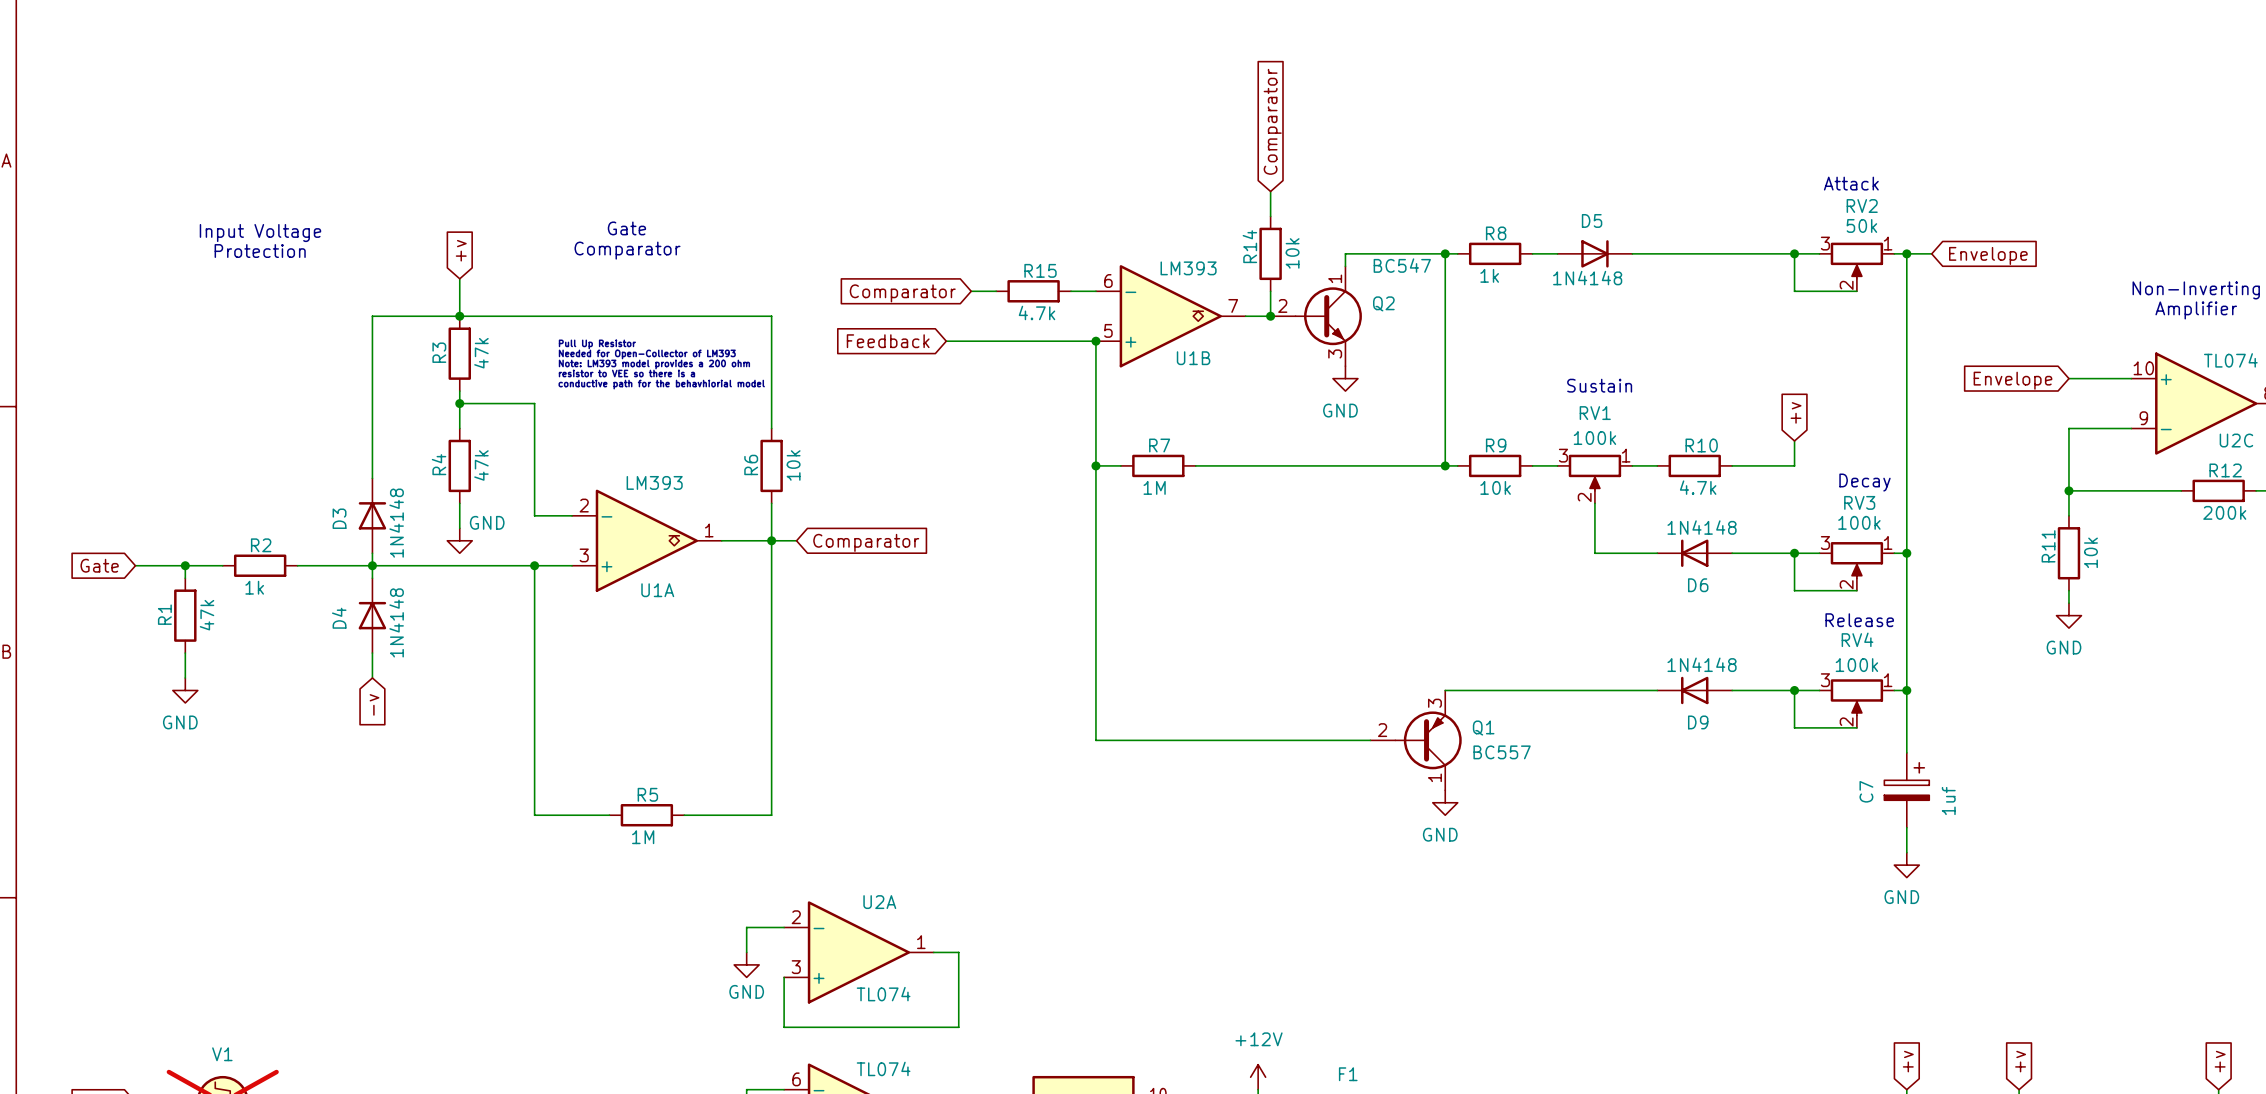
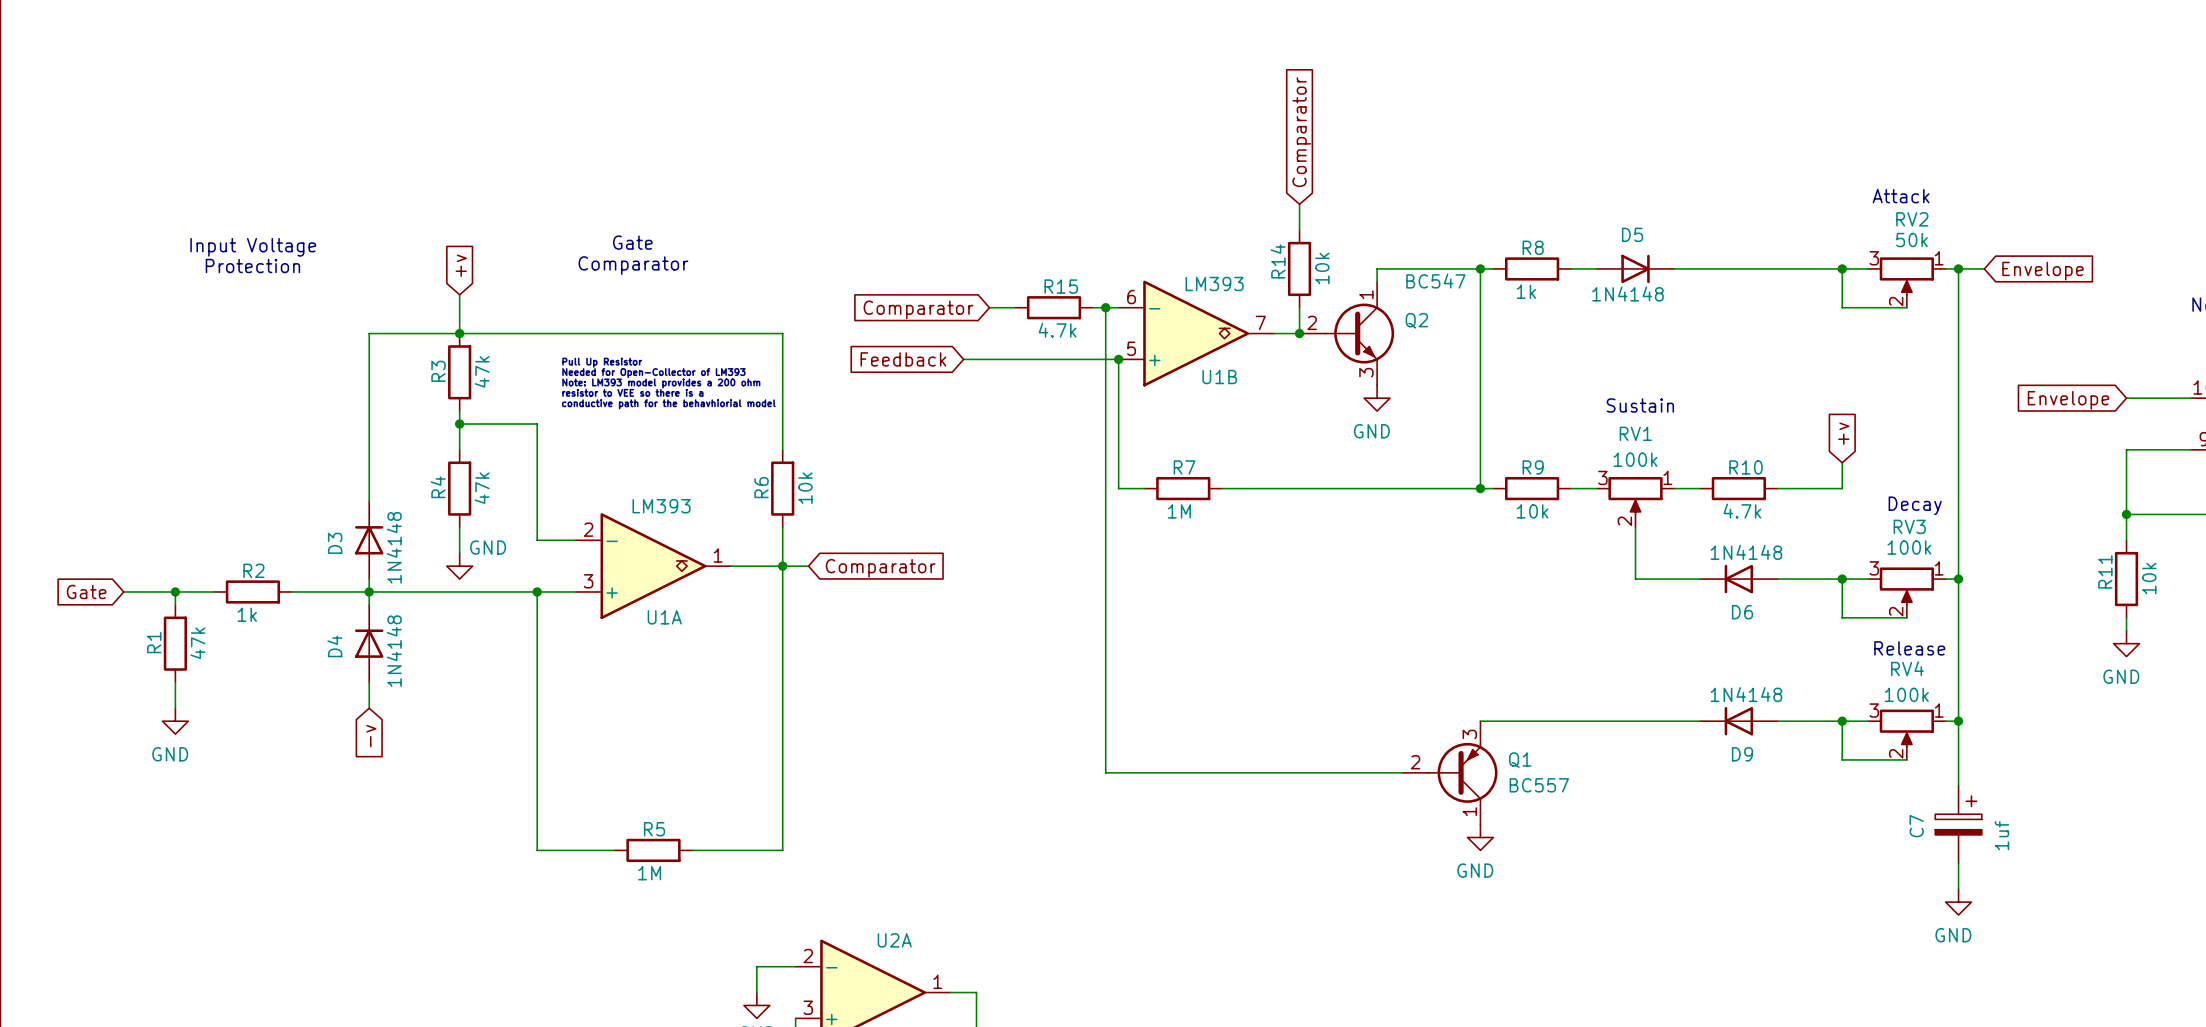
junction: none -> (1105, 307)
wire: (1095, 465) (1095, 740) -> (1105, 307) (1105, 772) (1118, 772)
junction: (1095, 465) -> none

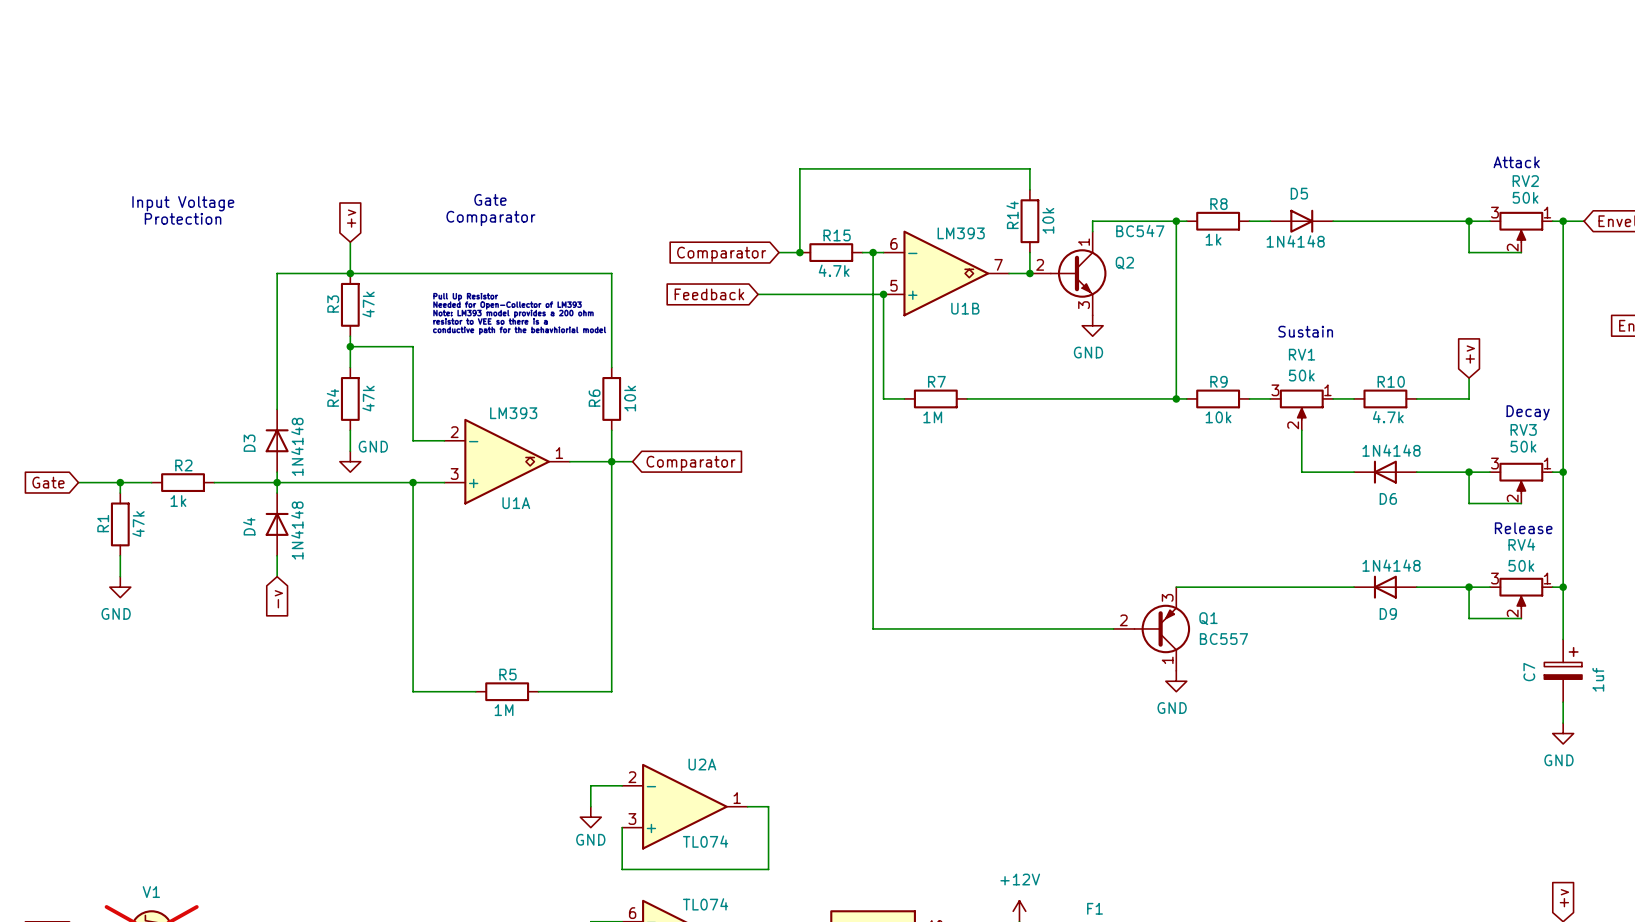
global label: Comparator (1301, 132) -> none
wire: none -> (1029, 168) (799, 168) (799, 252)
junction: none -> (799, 252)
RV1 value: 100k (1635, 459) -> 50k (1301, 375)
RV3 value: 100k (1909, 547) -> 50k (1523, 446)
RV4 value: 100k (1906, 694) -> 50k (1521, 565)

